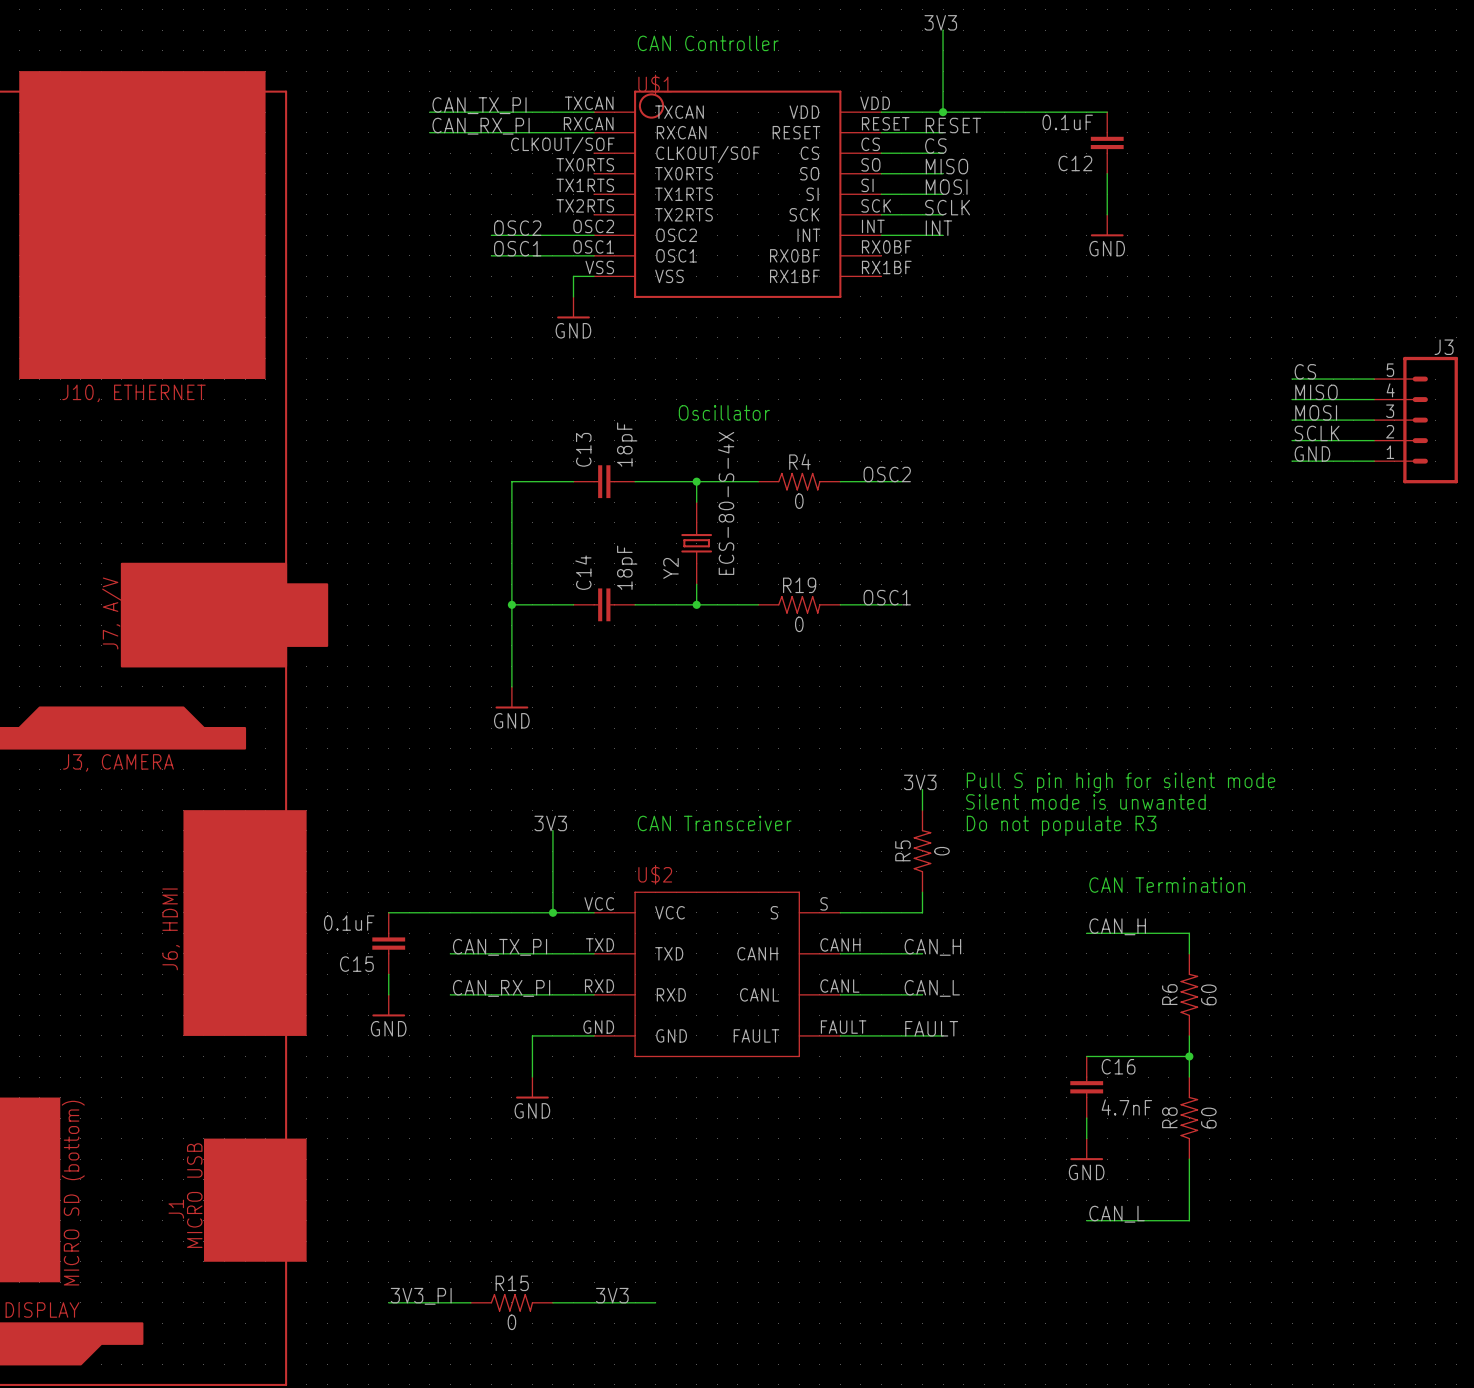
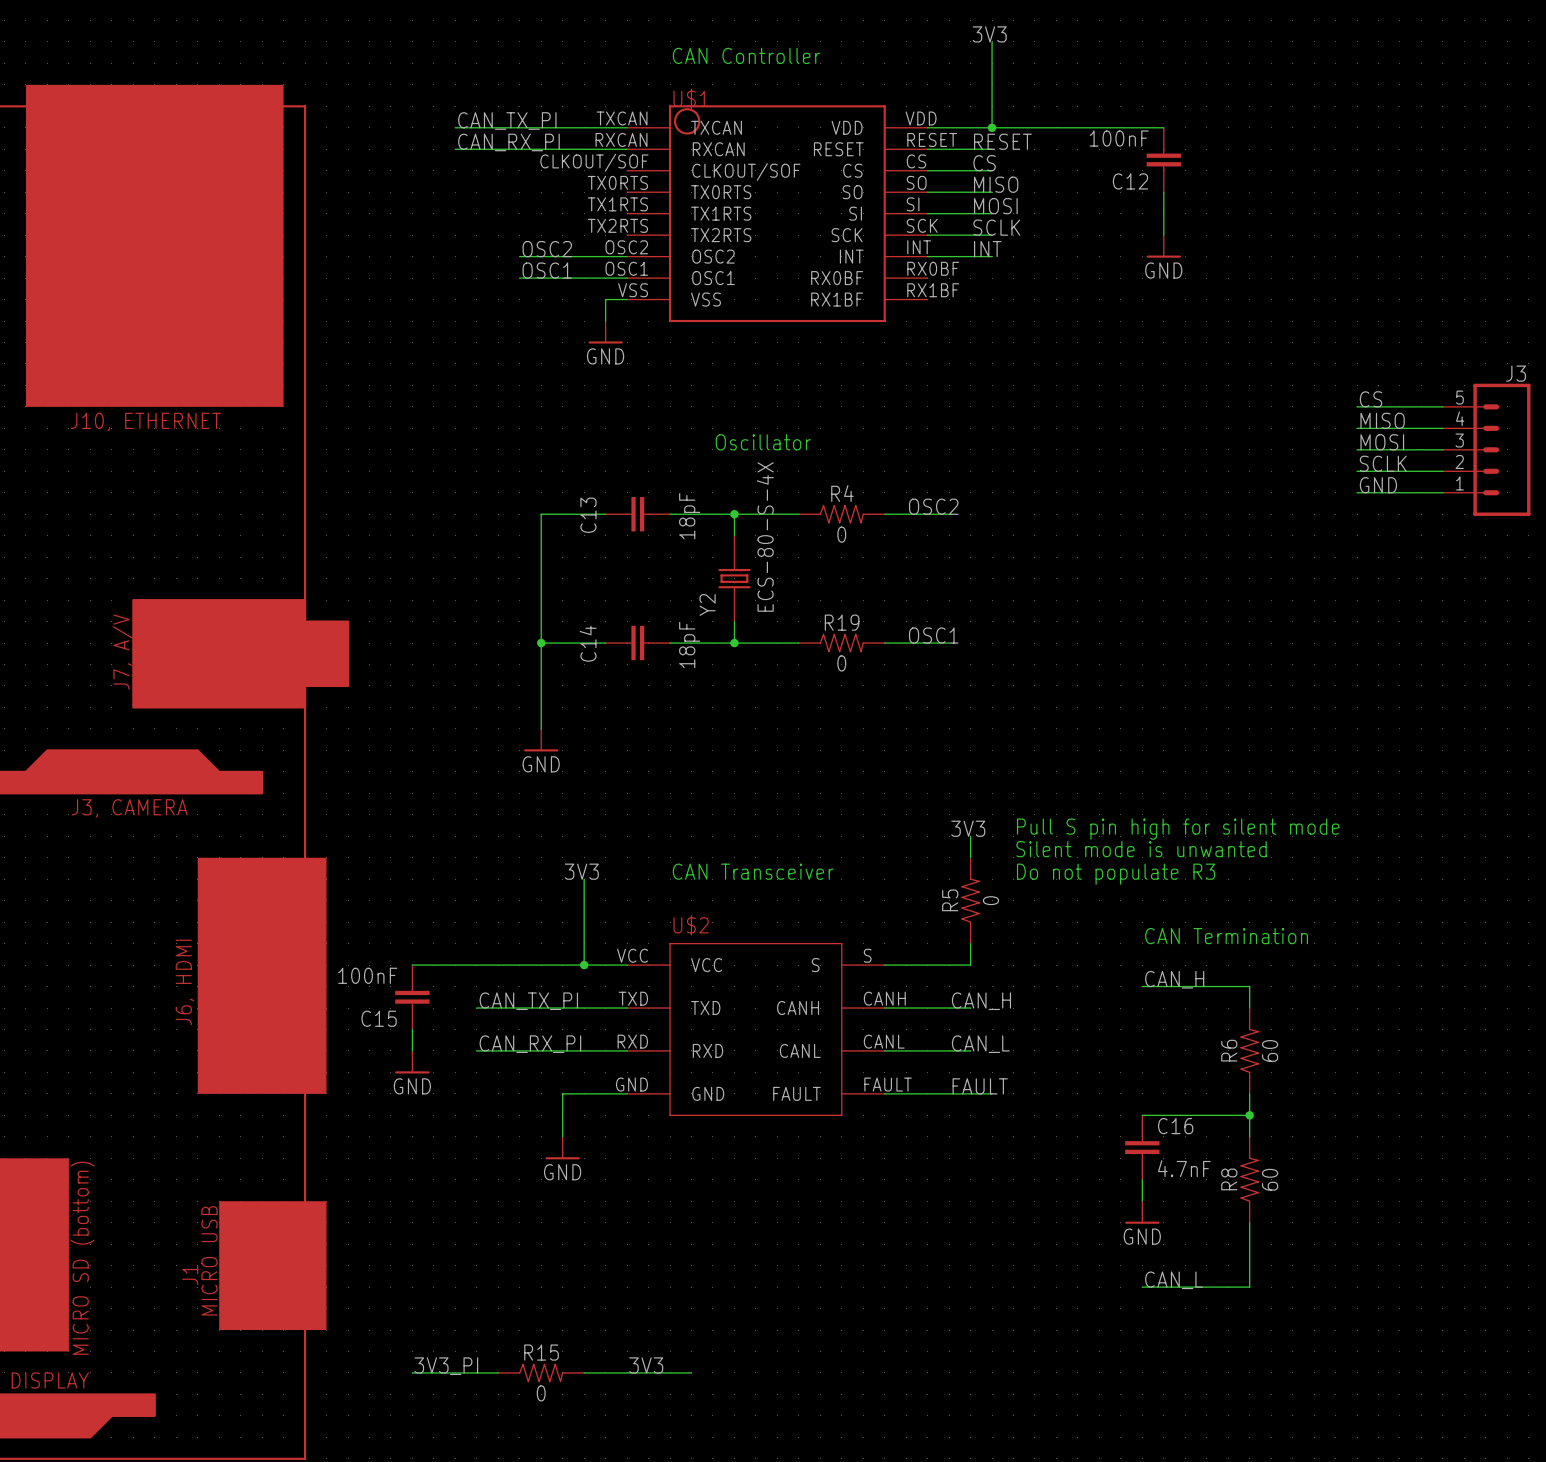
C12 value: 0.1uF (1067, 122) -> 100nF (1119, 138)
C13 value position: 18pF (627, 444) -> 18pF (689, 516)
C13 name position: C13 (583, 449) -> C13 (588, 515)
C14 value position: 18pF (627, 567) -> 18pF (689, 645)
C14 name position: C14 (583, 572) -> C14 (588, 643)
C15 value: 0.1uF (349, 923) -> 100nF (367, 975)

